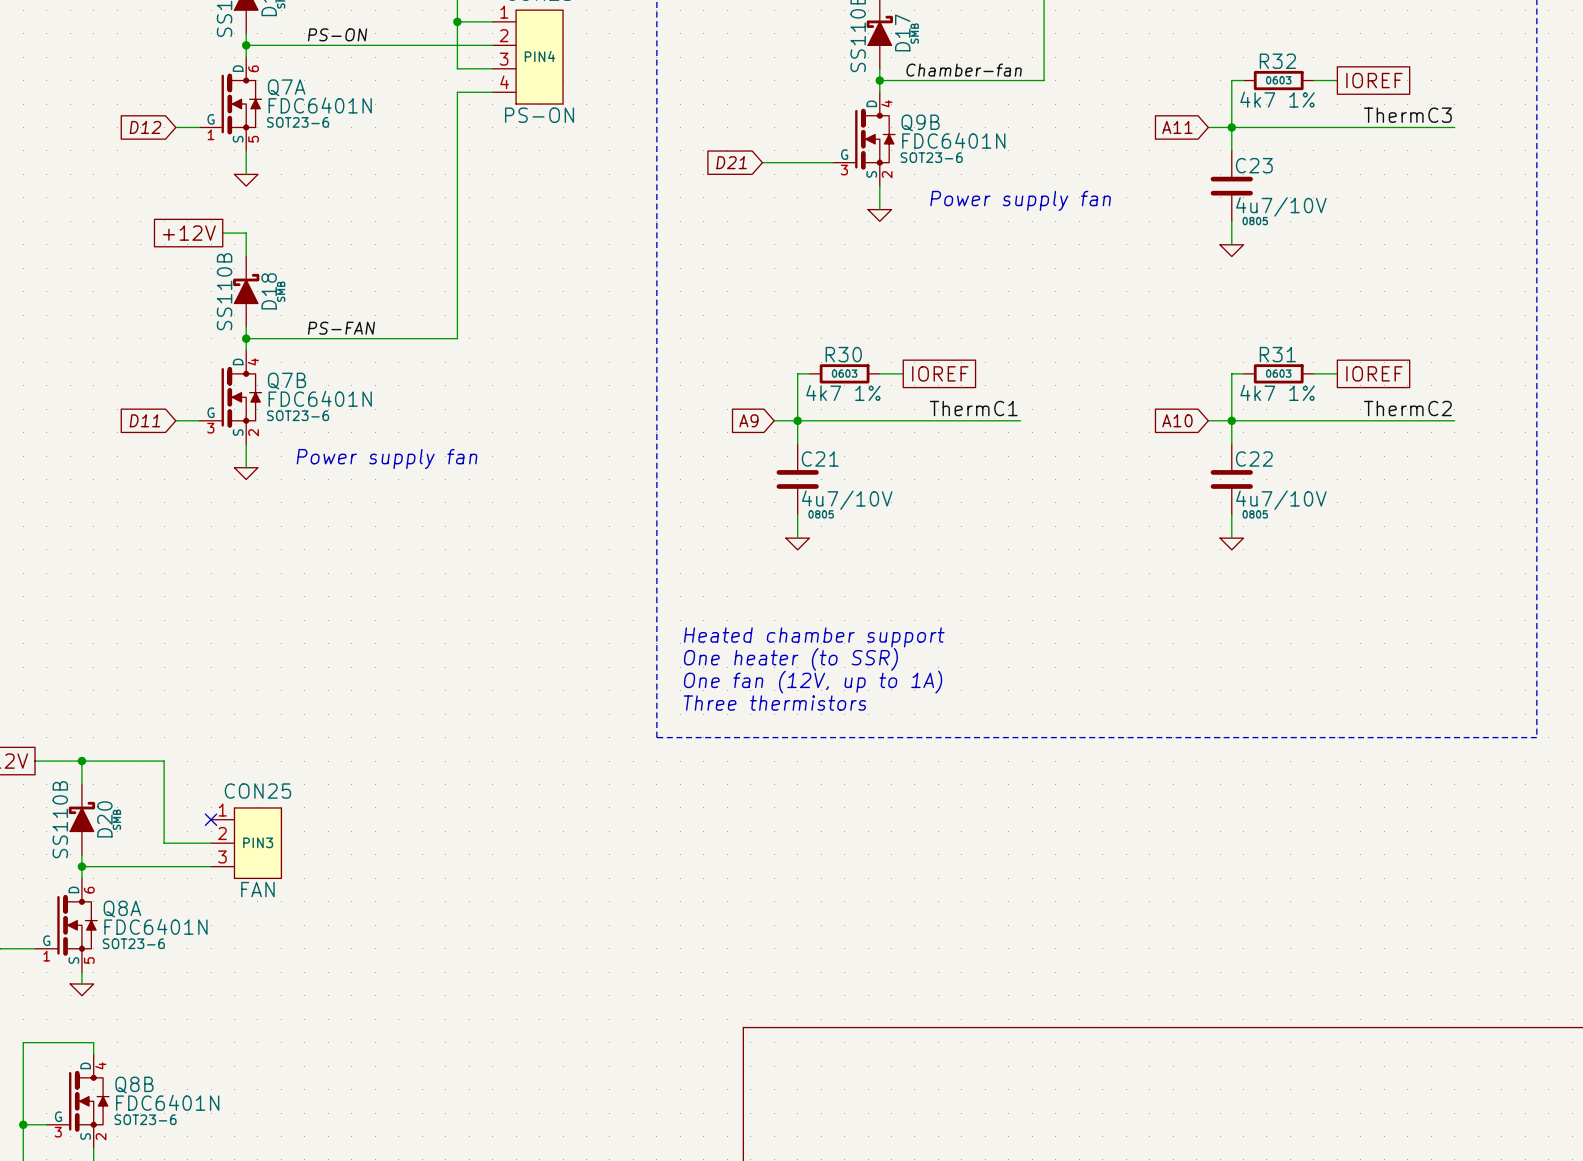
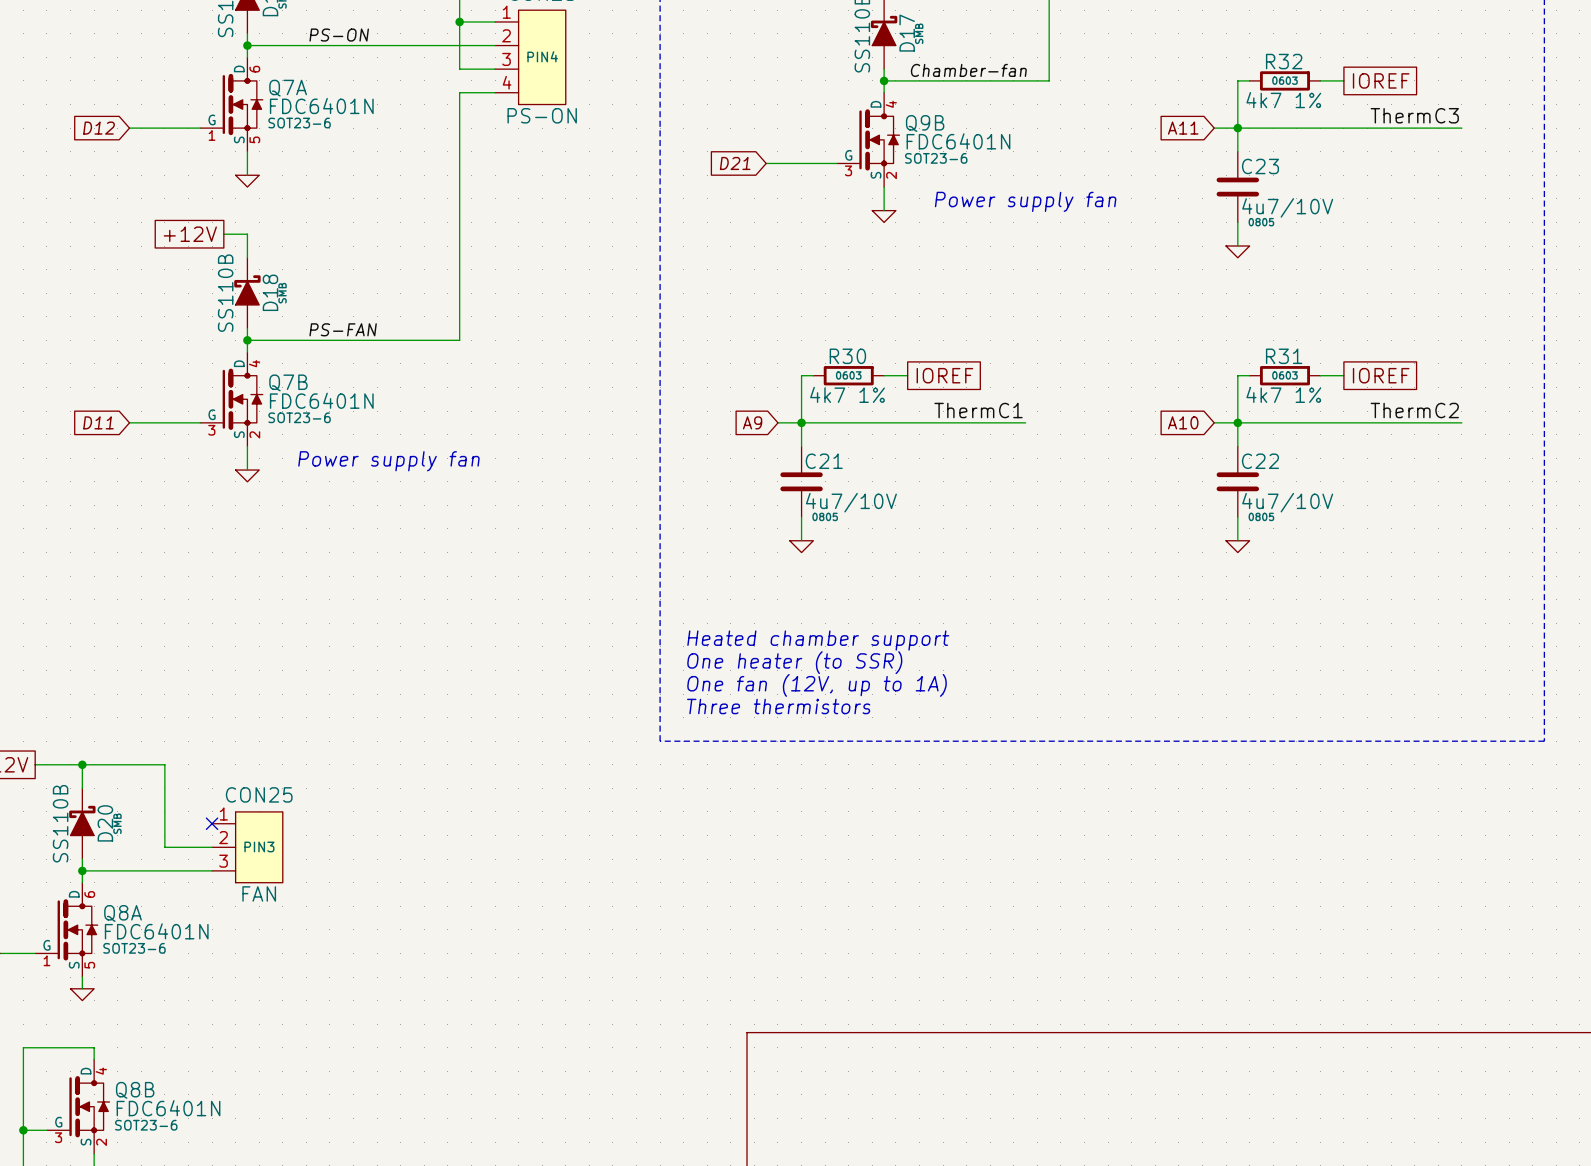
wire: none -> (129, 128) (176, 128)
global label position: D12 (145, 127) -> D12 (99, 128)
wire: none -> (129, 422) (176, 422)
global label position: D11 (144, 420) -> D11 (98, 422)

